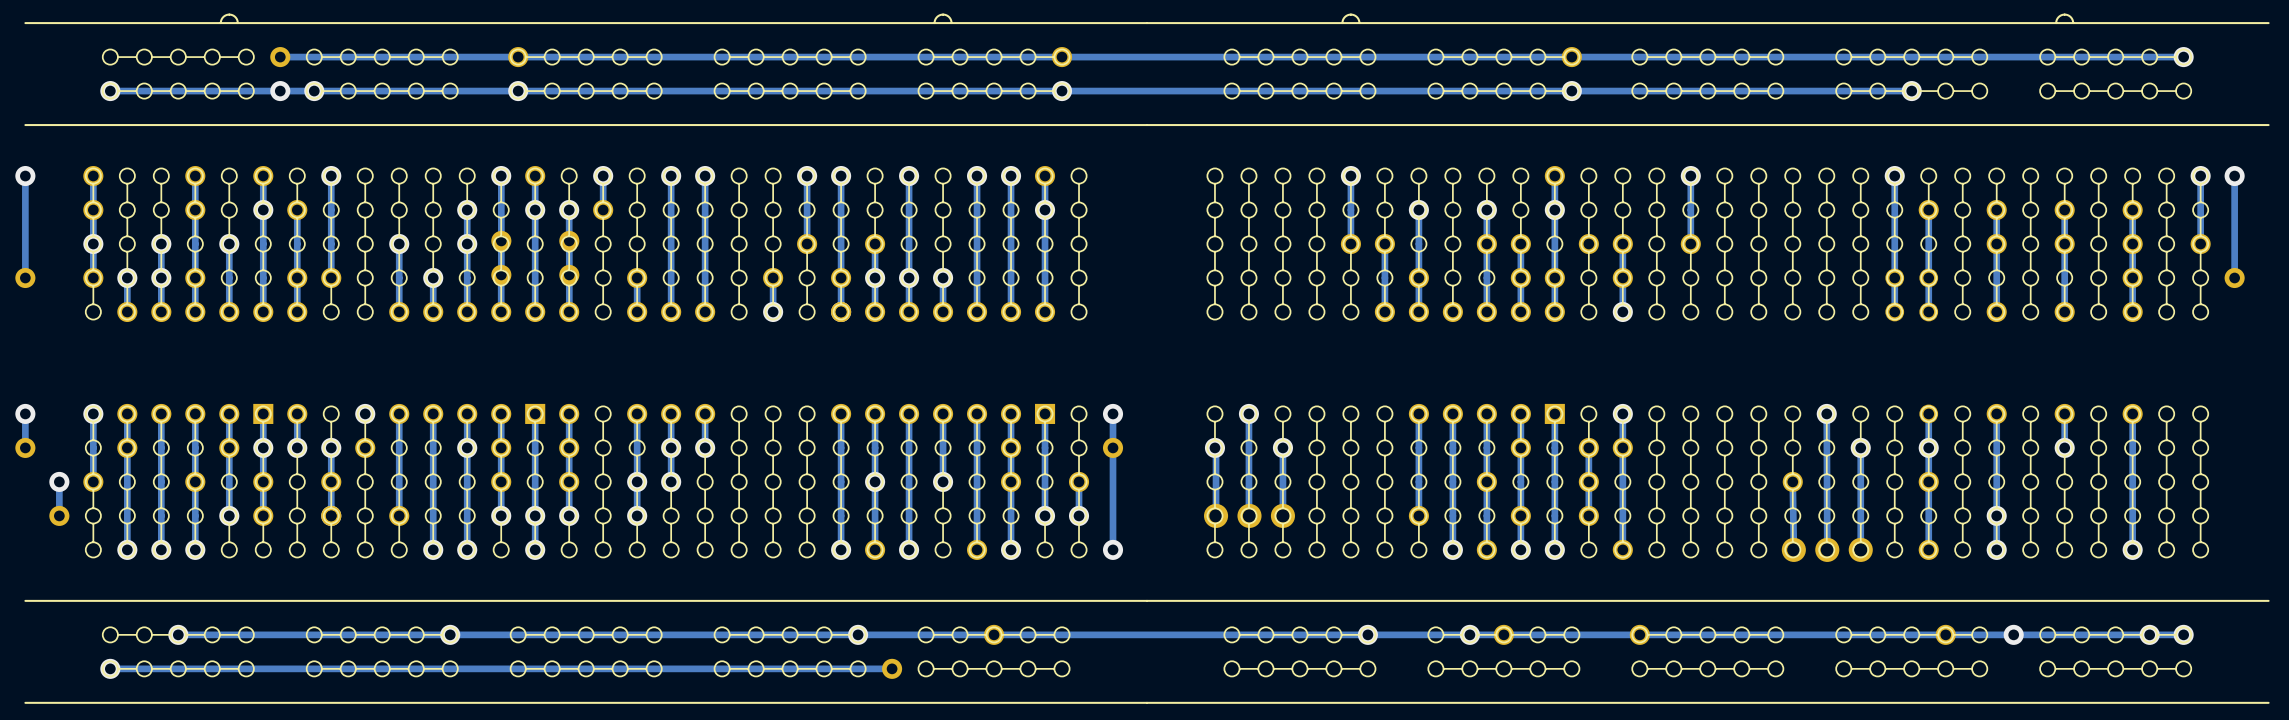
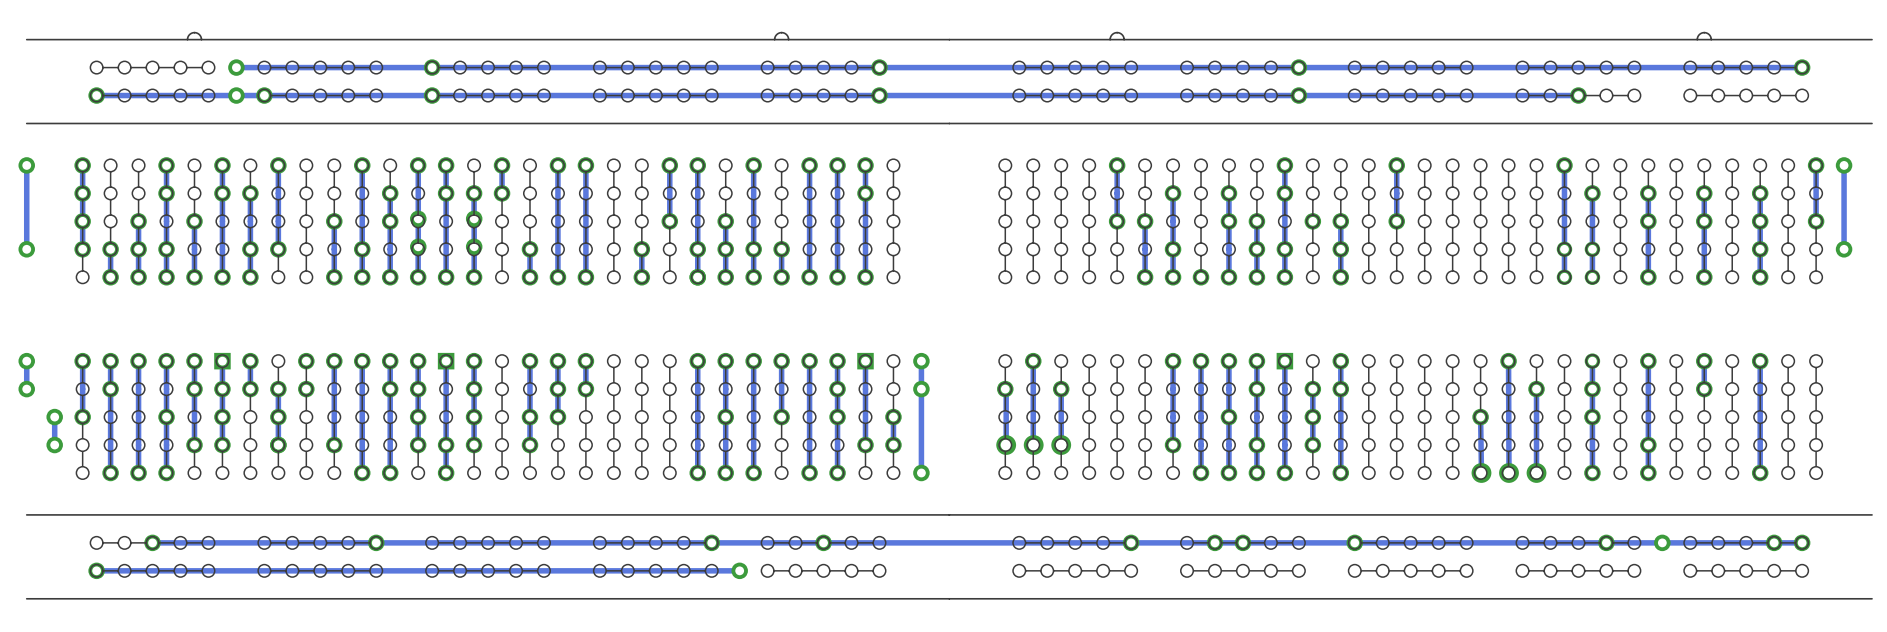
track: none -> (362, 165) (362, 249)
via: none -> (362, 165)

